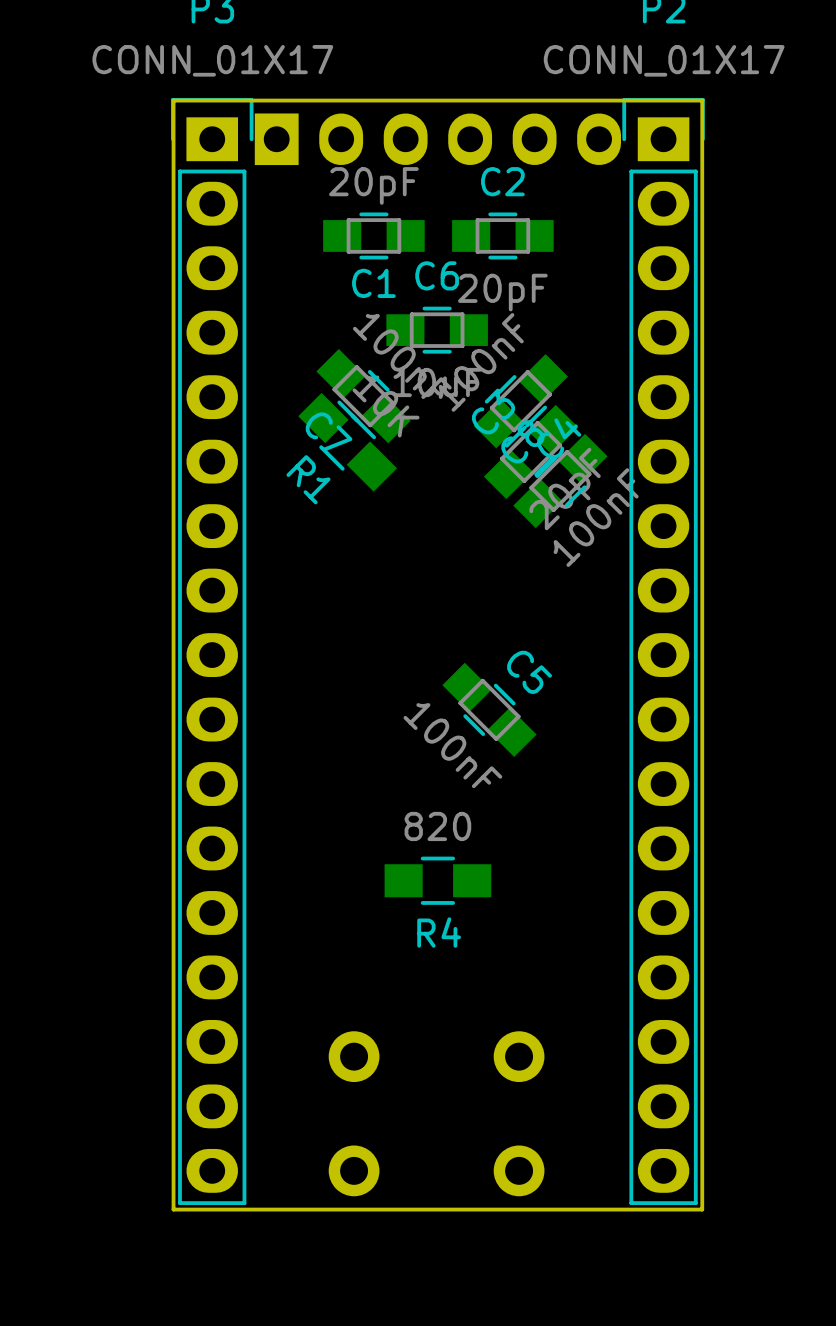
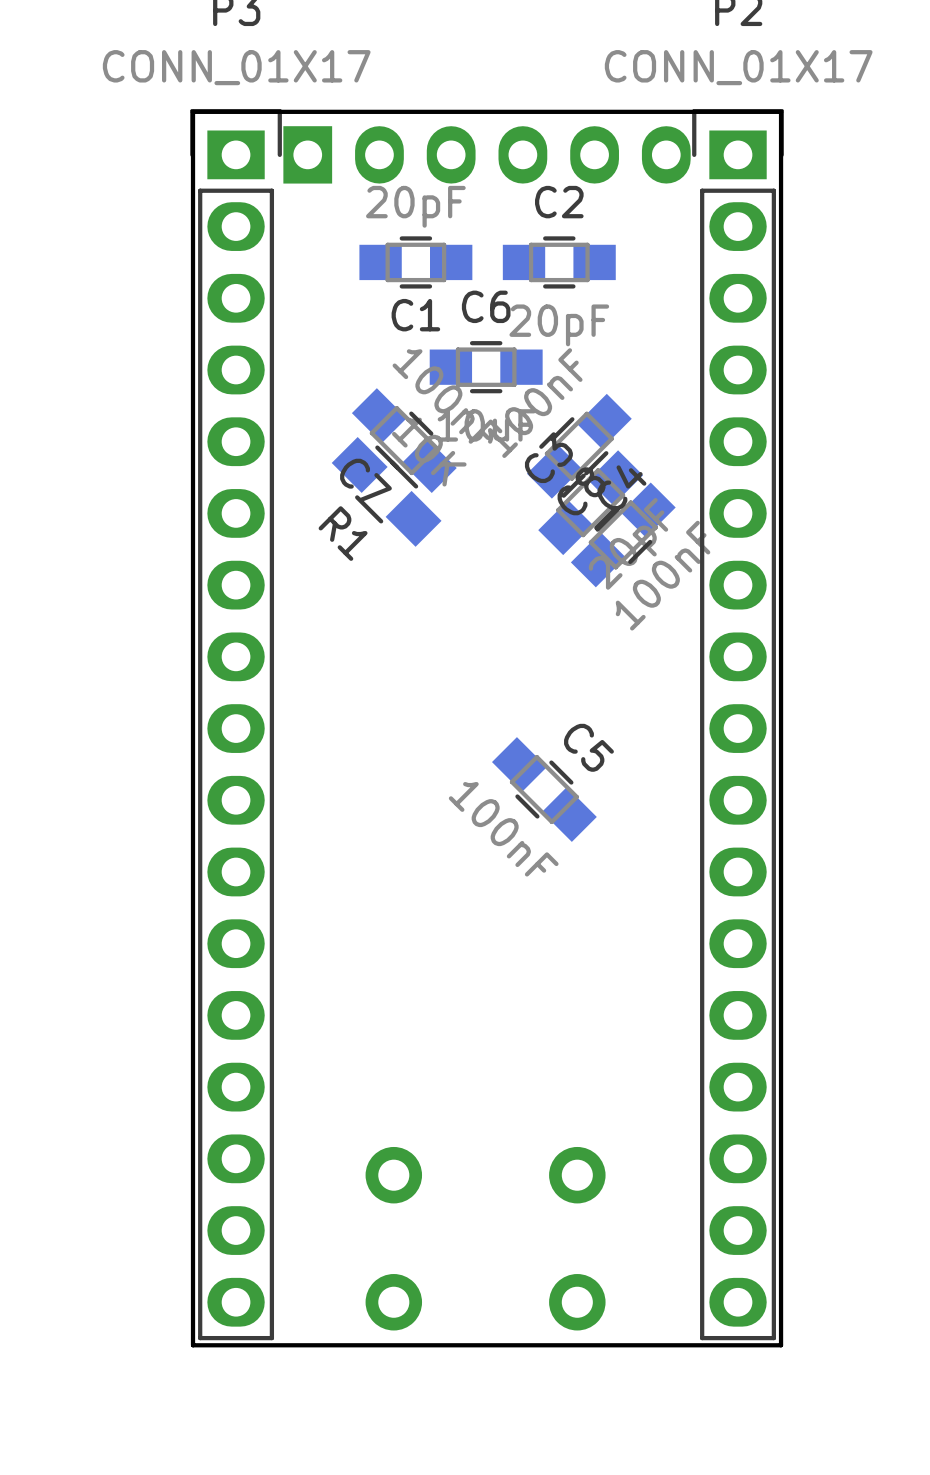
R4: 820 (437, 880) -> none

